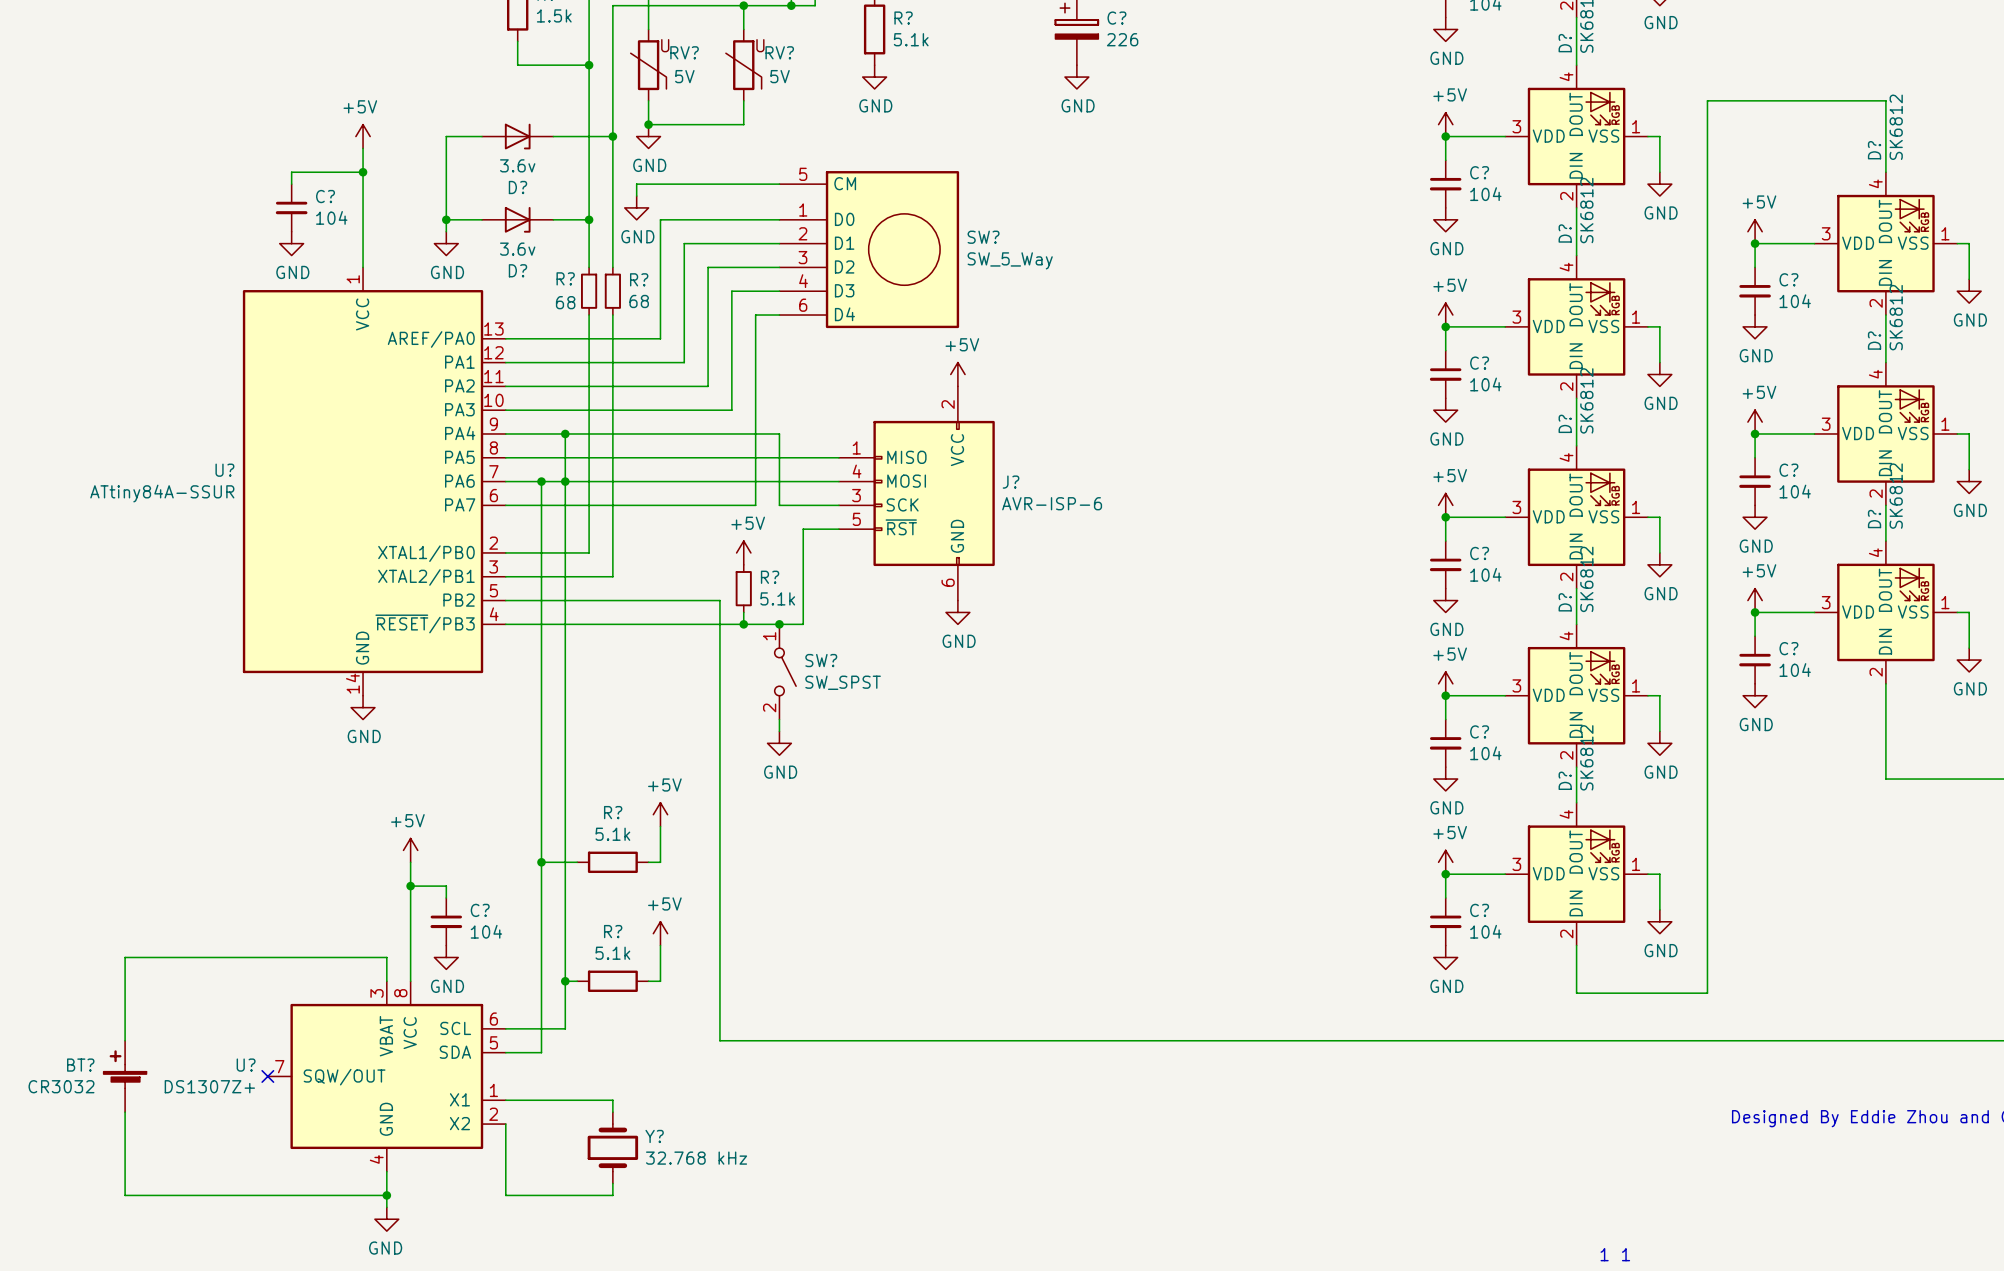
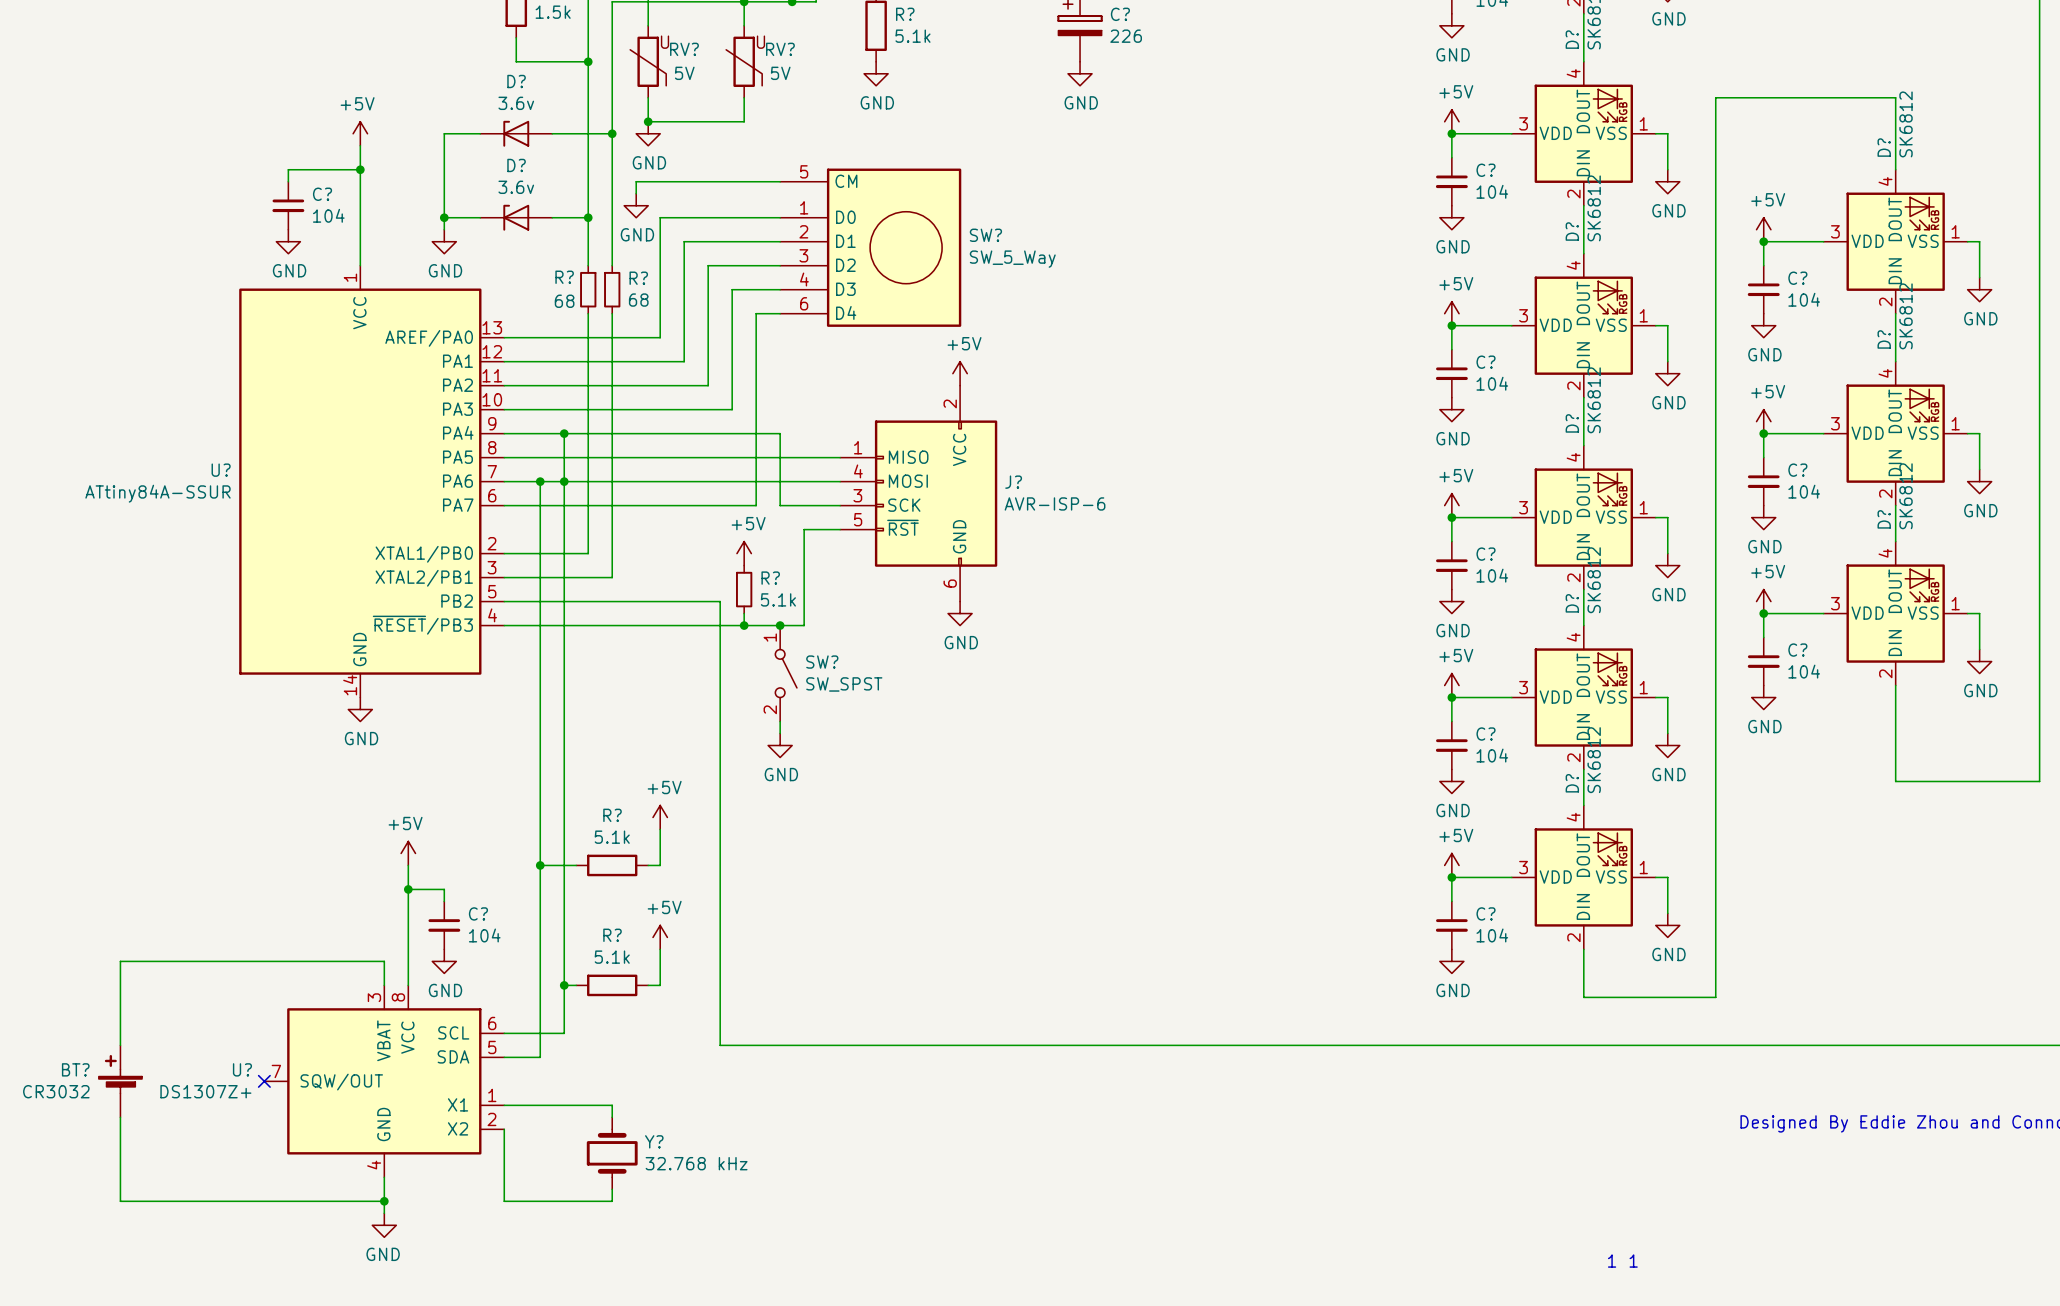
D? rotation: 0° (517, 136) -> 180° (516, 133)
D? rotation: 0° (517, 219) -> 180° (516, 217)

